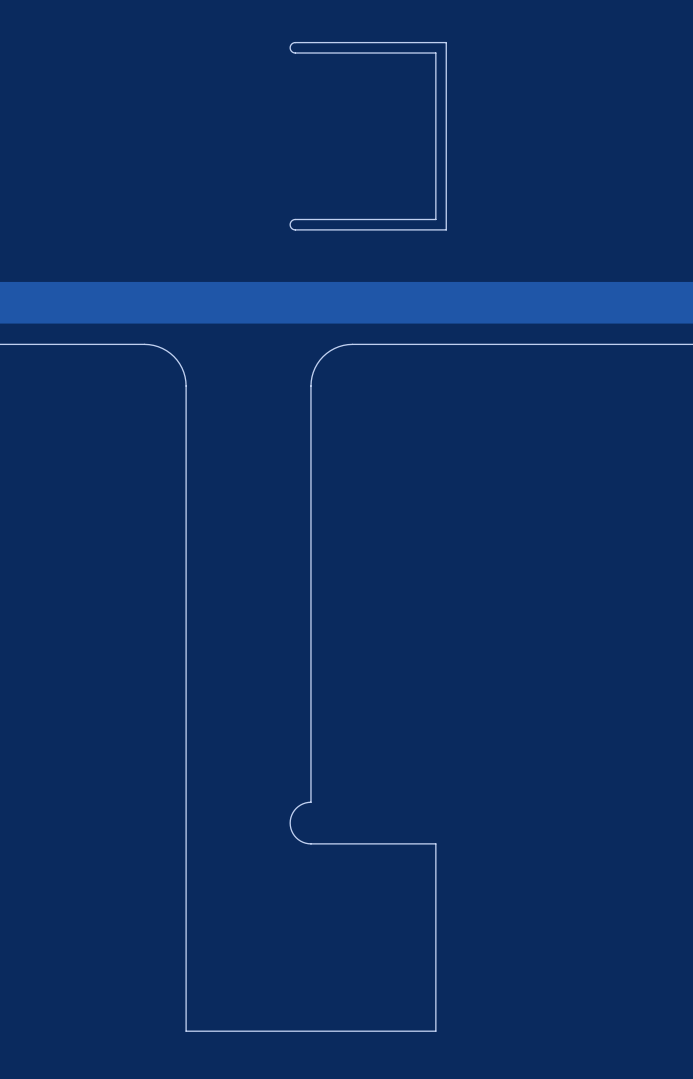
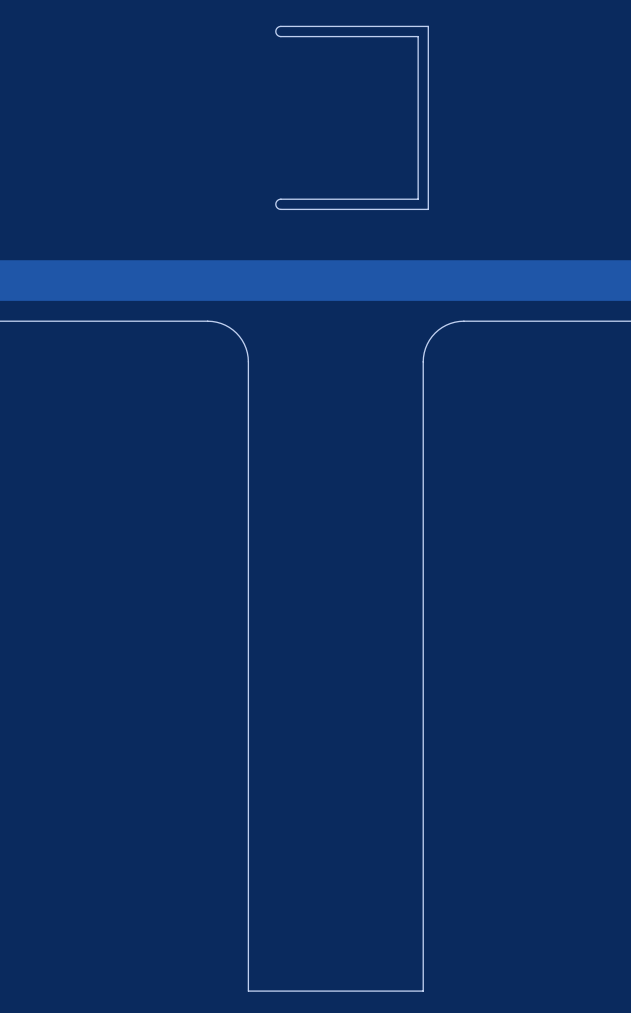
board edge: (482, 344) (343, 345) (330, 350) (320, 360) (313, 372) (311, 381) (310, 802) (303, 803) (294, 810) (290, 817) (290, 825) (296, 837) (308, 843) (435, 843) (435, 1031) (186, 1031) (185, 381) (181, 367) (170, 353) (158, 346) (144, 344) -> (463, 321) (450, 323) (438, 330) (427, 344) (423, 357) (423, 991) (248, 991) (247, 352) (244, 344) (236, 333) (225, 325) (216, 322) (133, 321)

